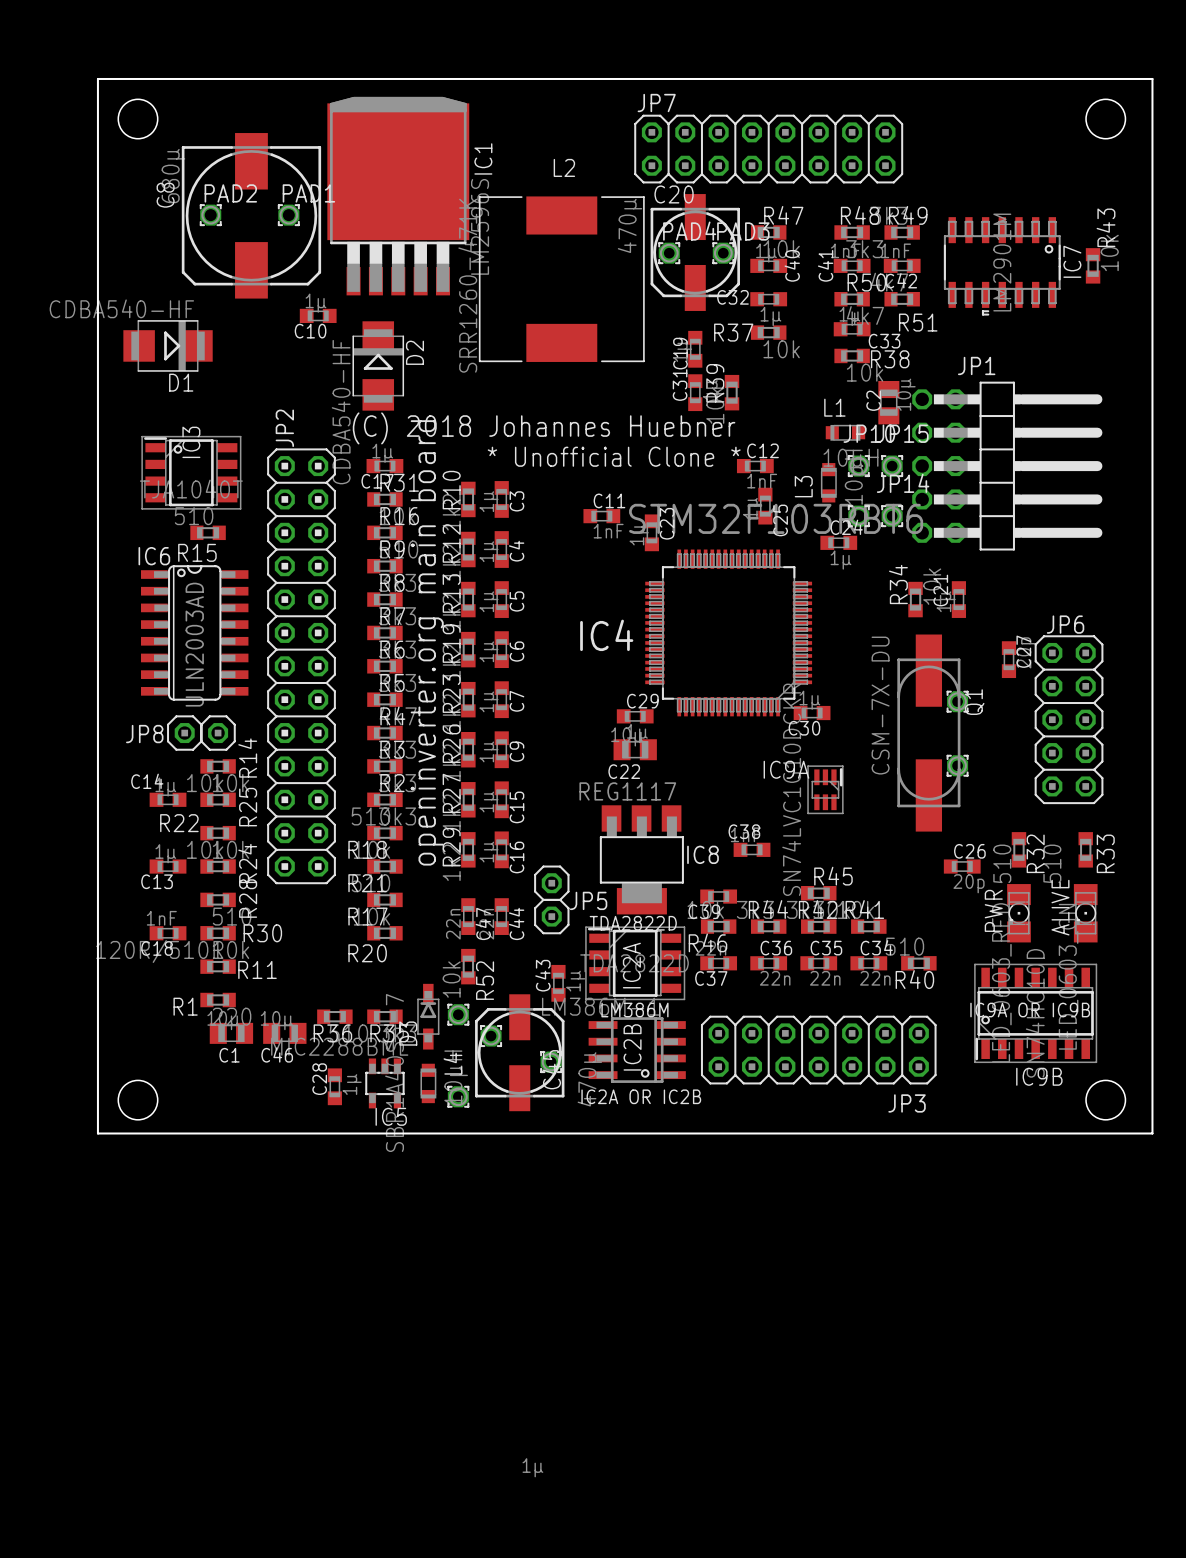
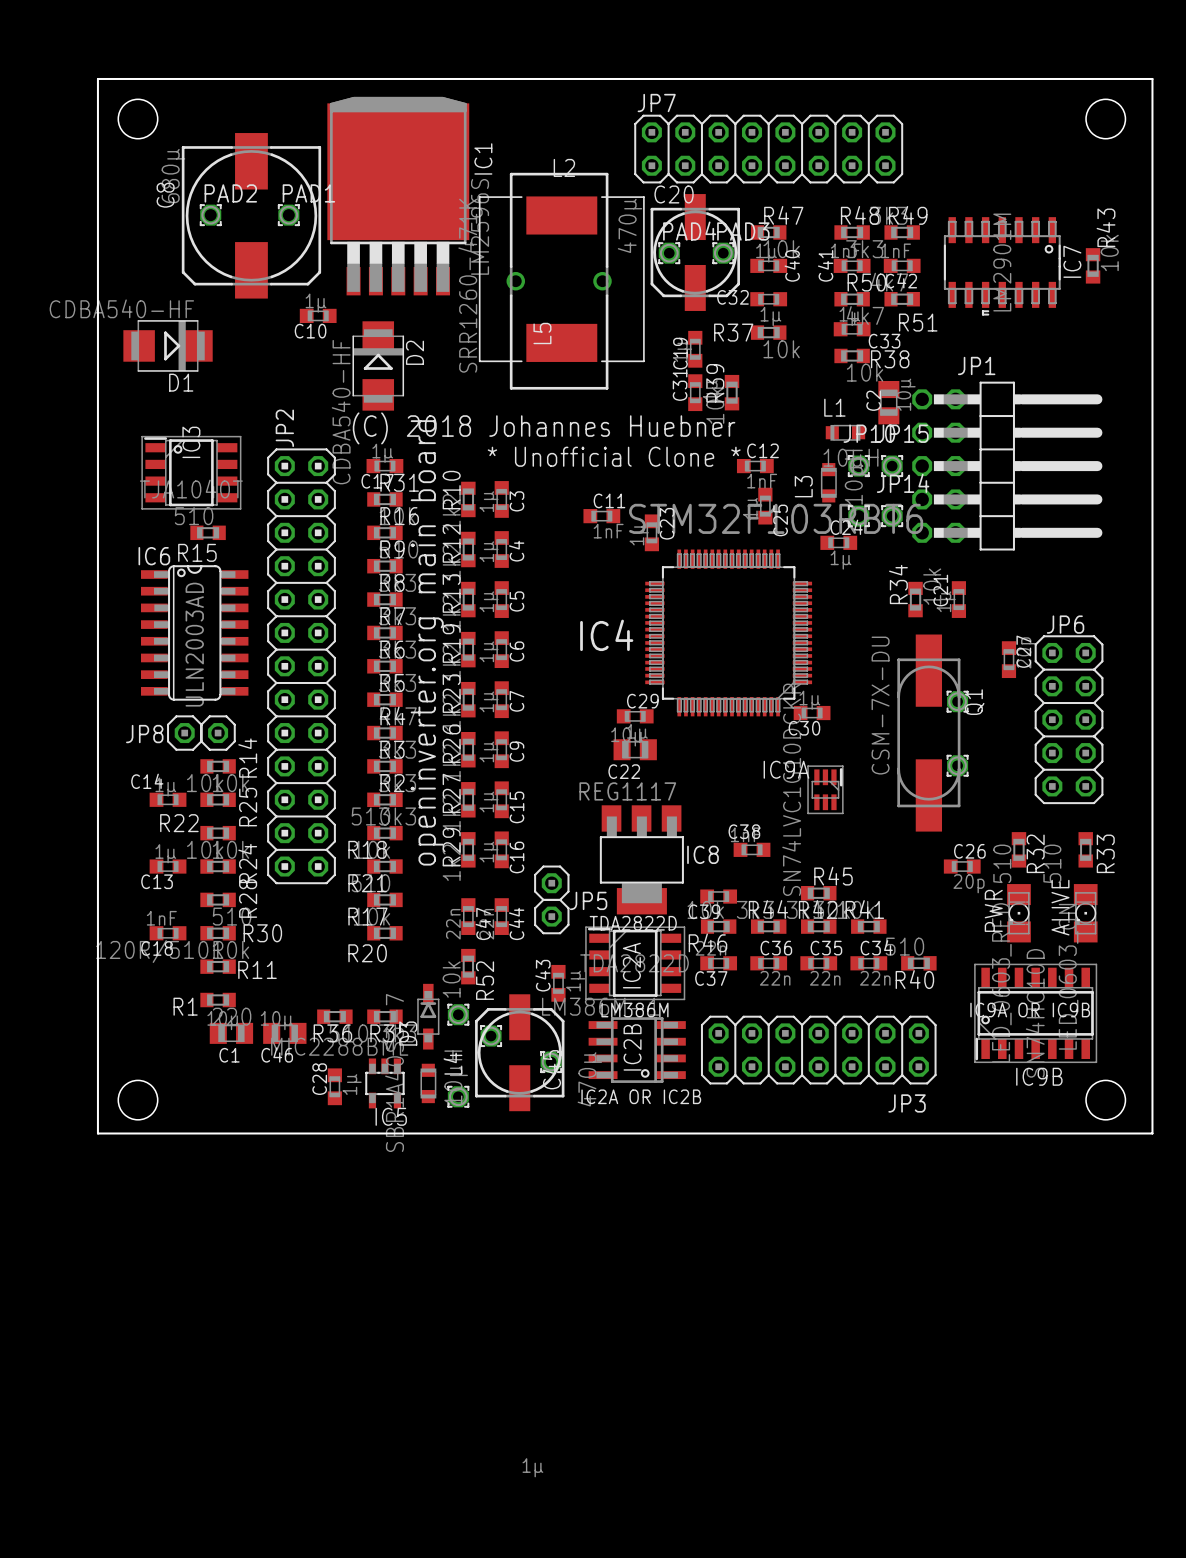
L5: none -> (559, 281)

